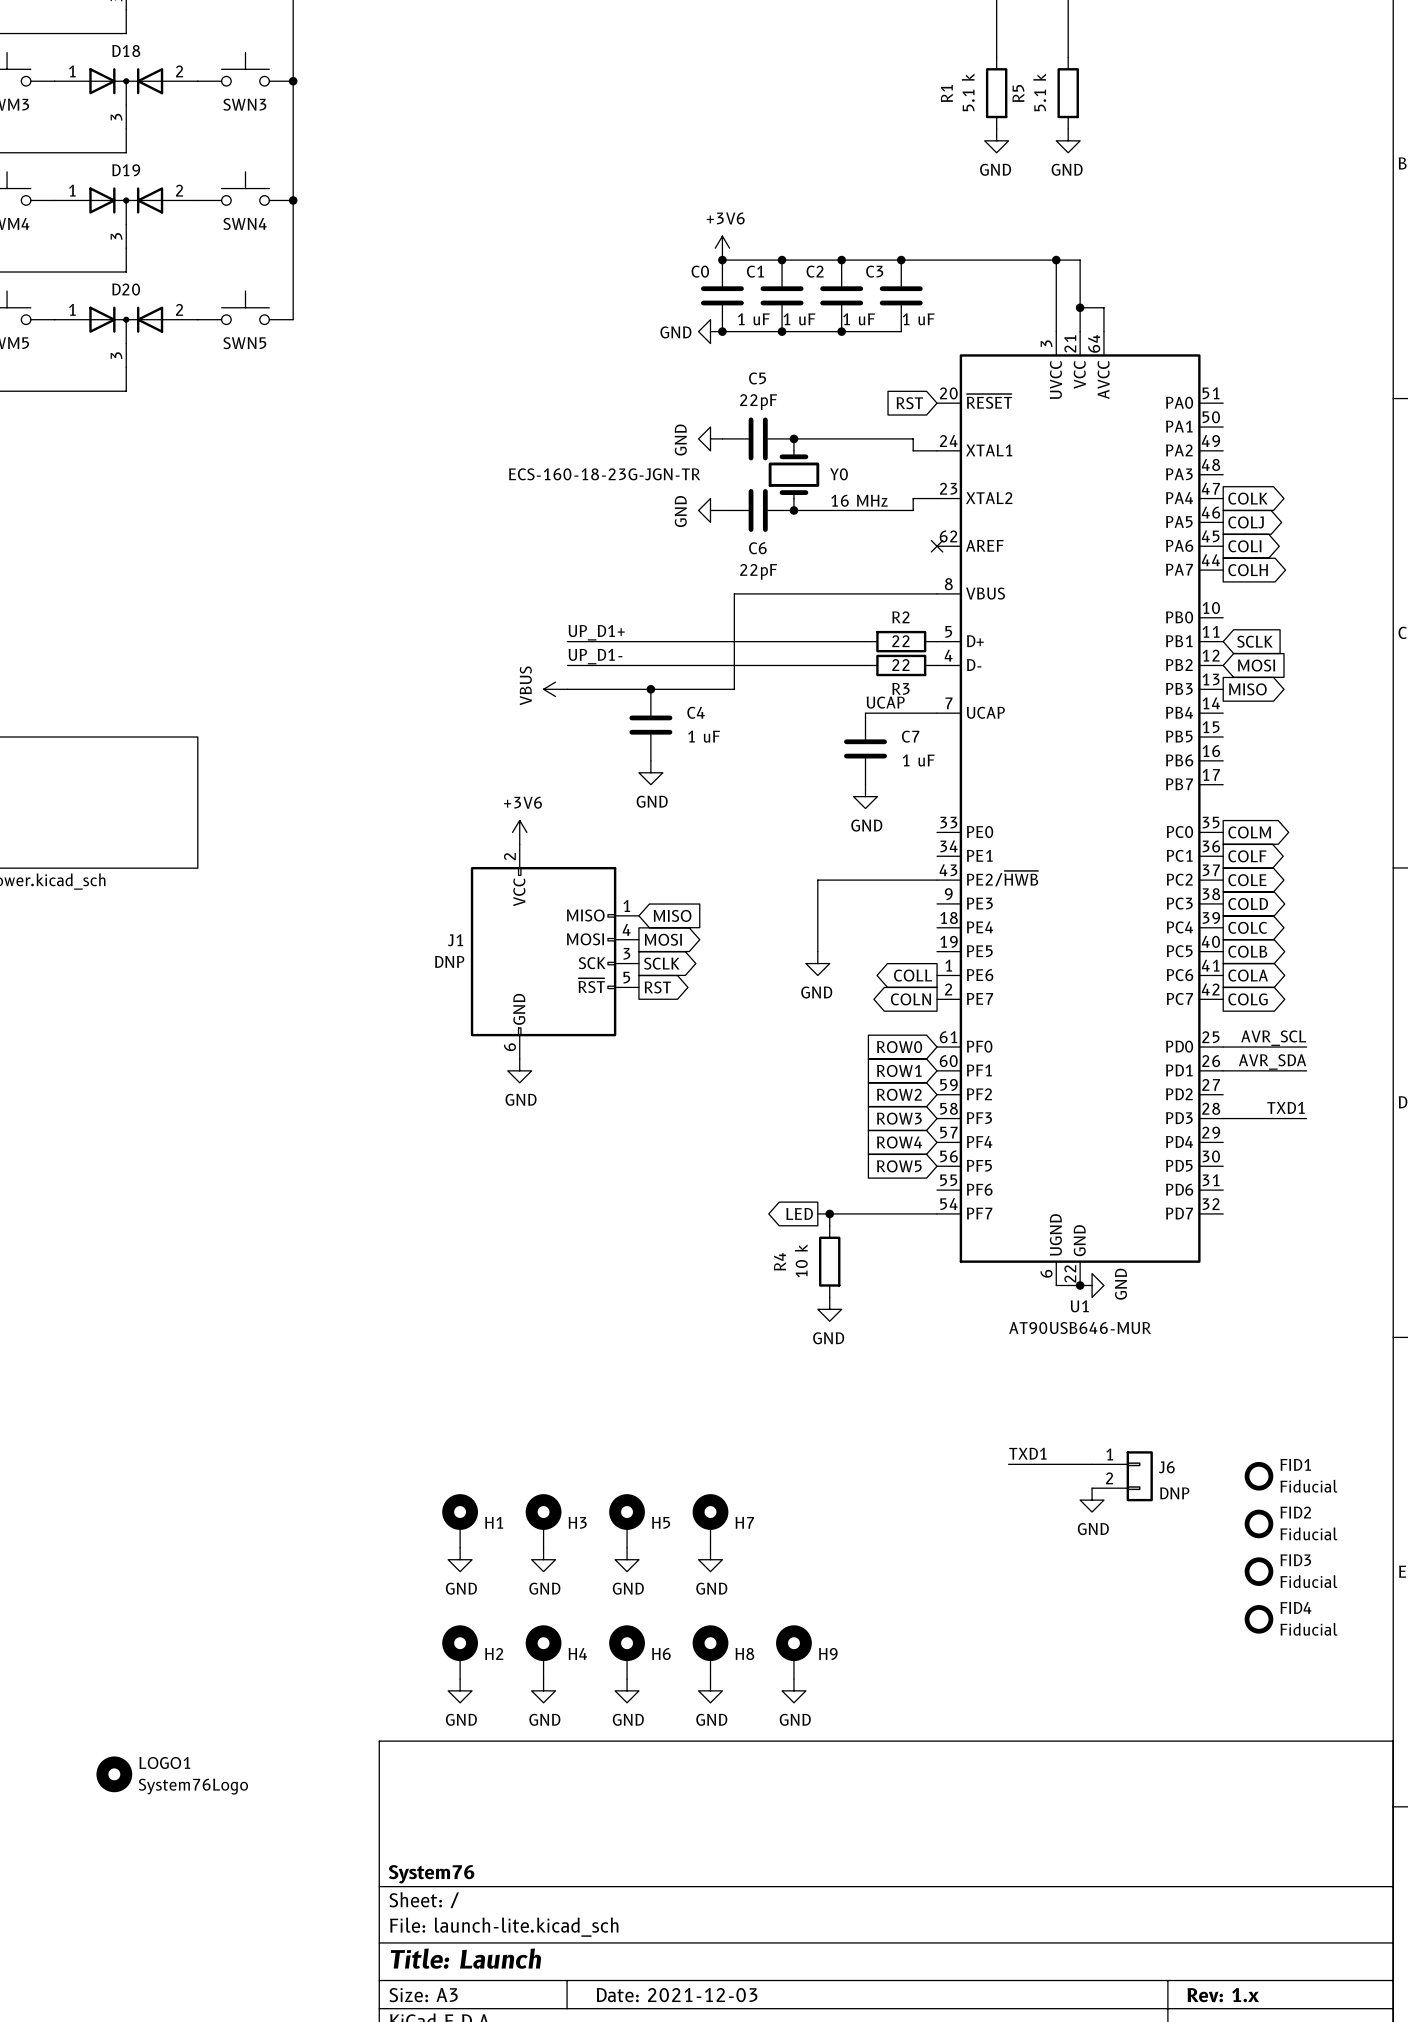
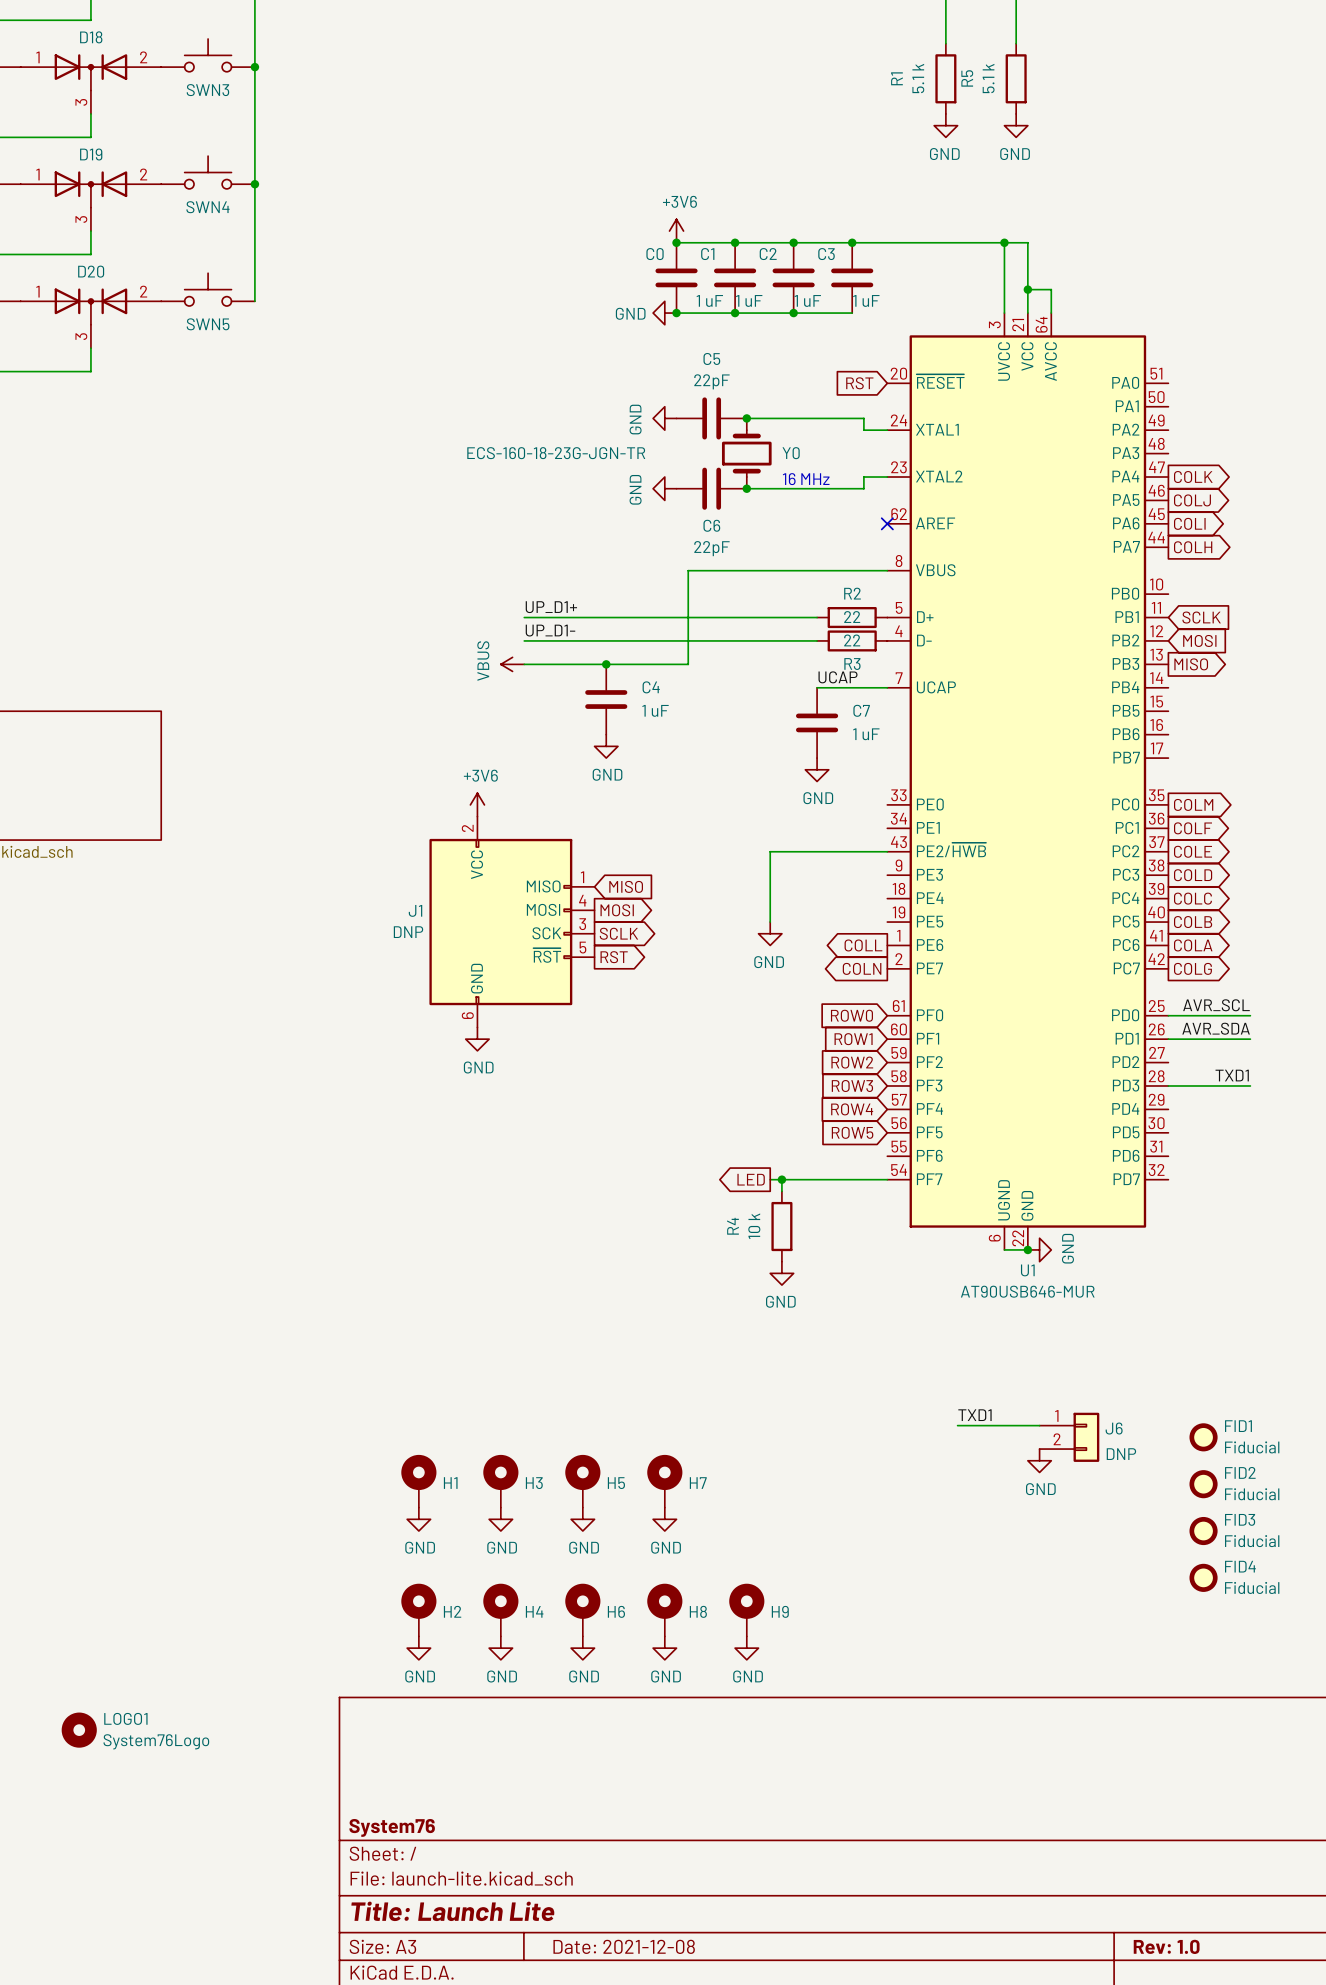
title block: Title: Launch (465, 1958) -> Title: Launch Lite (452, 1911)
title block: Date: 2021-12-03 (677, 1995) -> Date: 2021-12-08 (624, 1946)
title block: Rev: 1.x (1223, 1995) -> Rev: 1.0 (1166, 1946)

